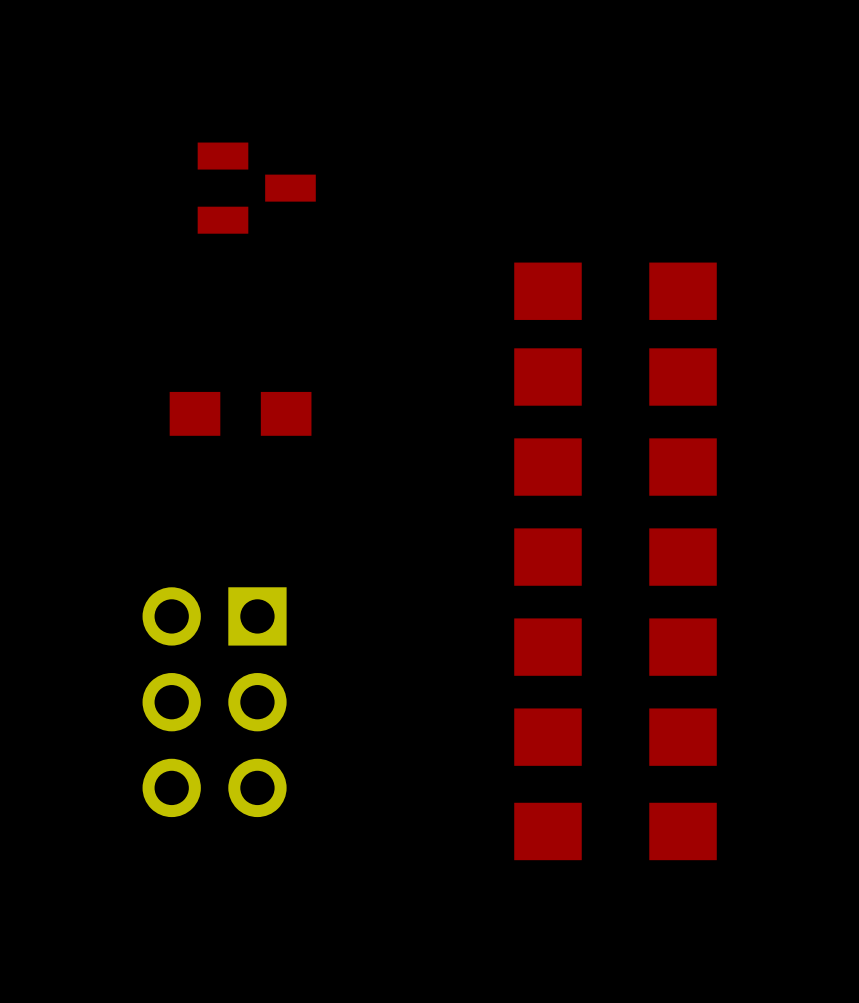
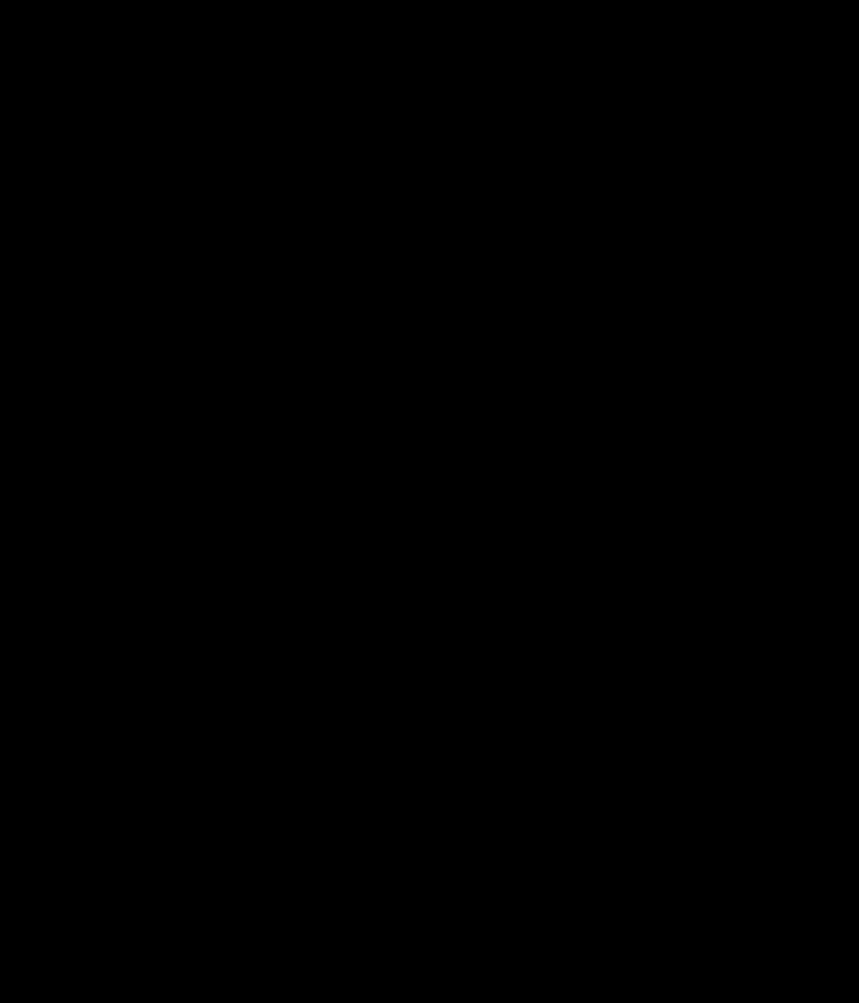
part: (256, 188) -> none
part: (615, 291) -> none
part: (615, 377) -> none
part: (240, 413) -> none
part: (615, 467) -> none
part: (615, 557) -> none
part: (615, 647) -> none
part: (214, 702) -> none
part: (615, 737) -> none
part: (615, 831) -> none

